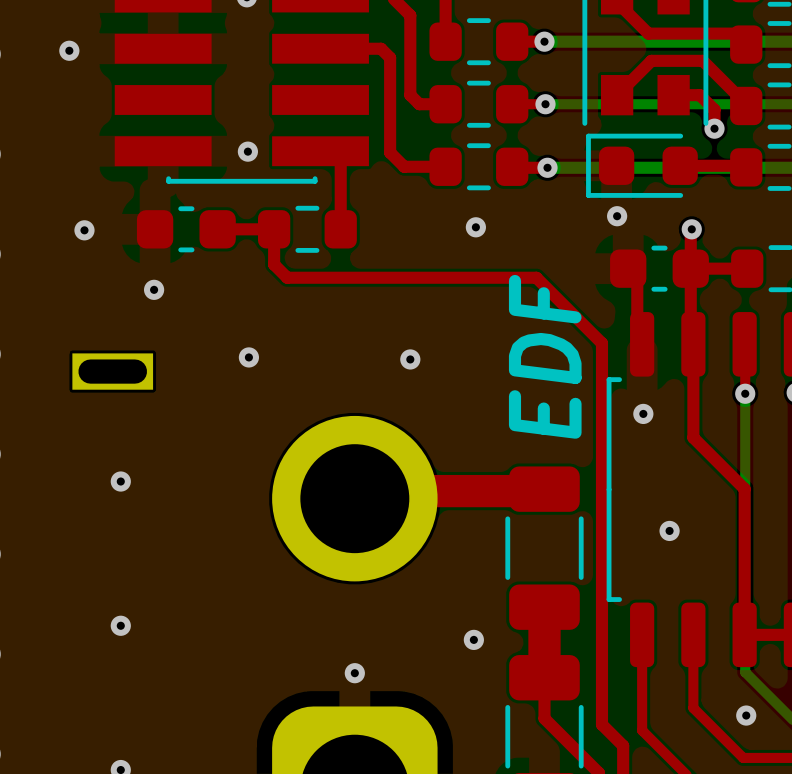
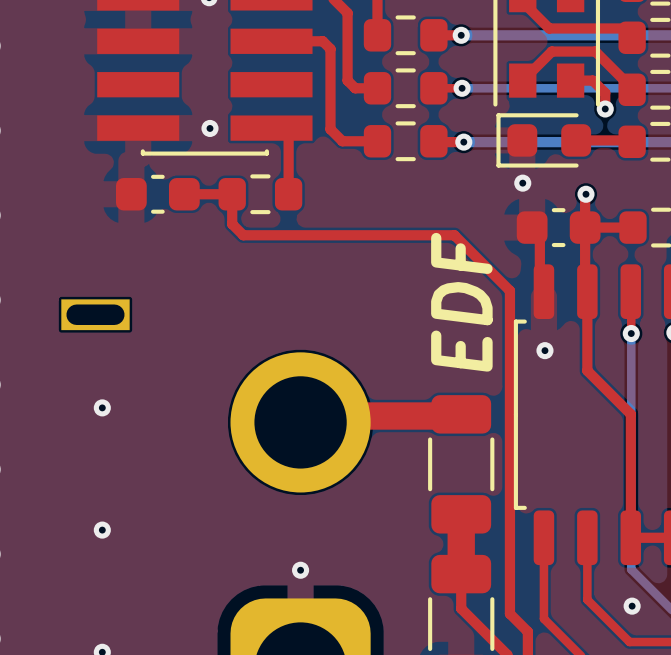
via: (69, 50) -> none
via: (475, 227) -> none
via: (84, 230) -> none
via: (154, 289) -> none
via: (248, 357) -> none
via: (410, 359) -> none
via: (669, 530) -> none
via: (473, 639) -> none

